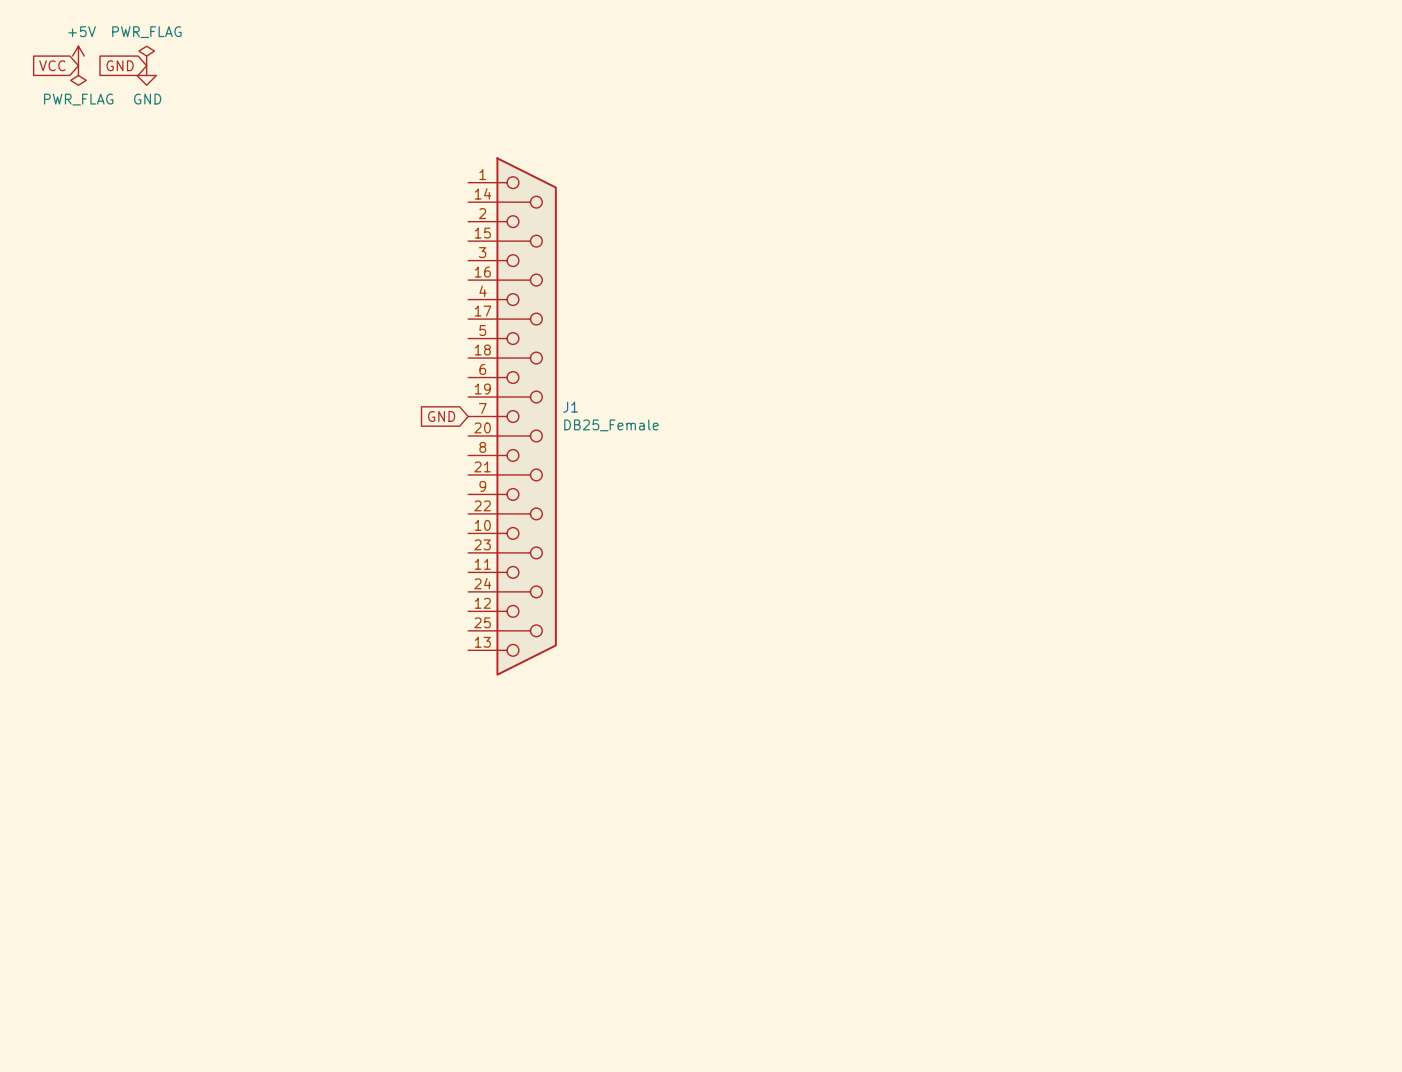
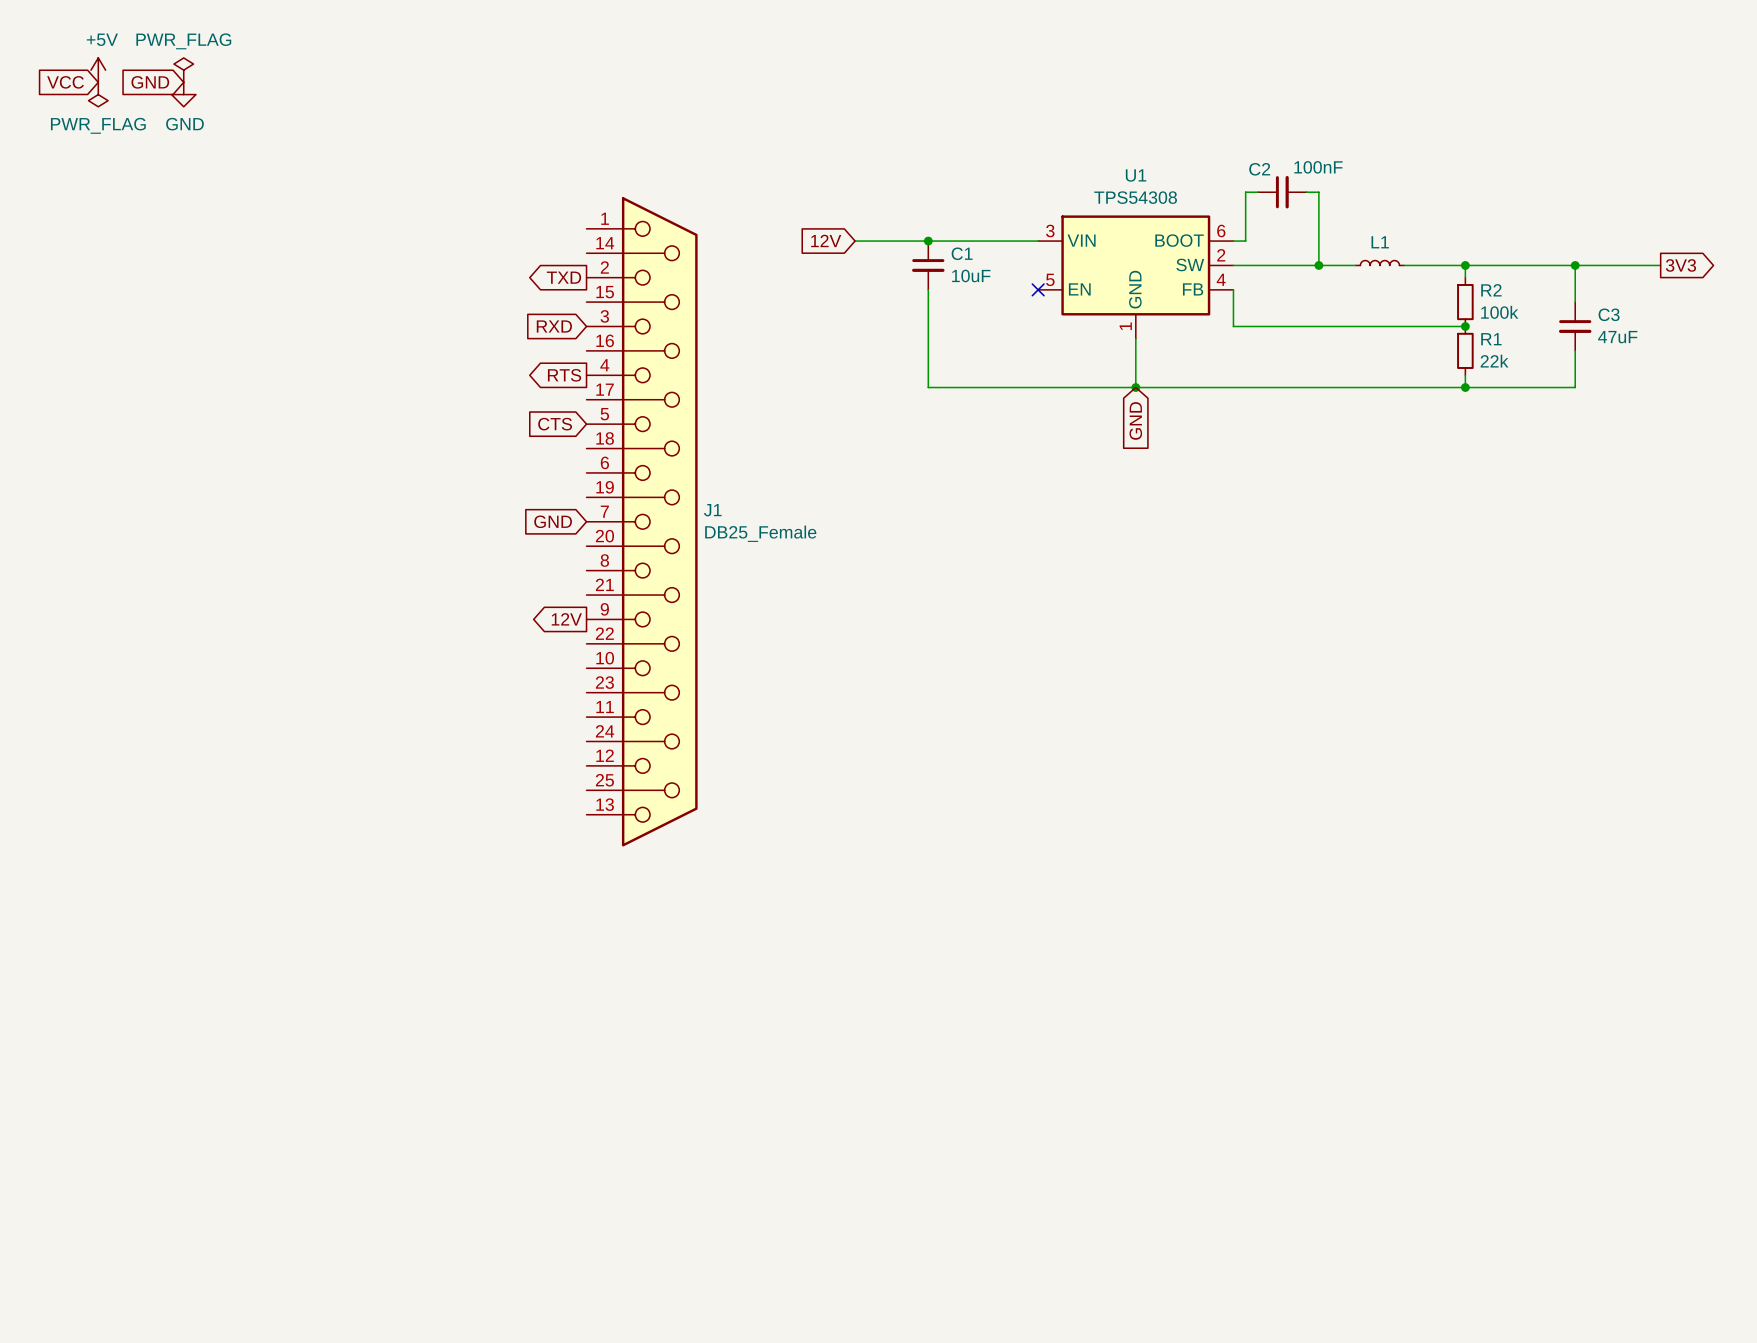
wire: none -> (1257, 192) (1245, 192) (1245, 241) (1233, 241)
C2: none -> 100nF (1282, 192)
wire: none -> (1306, 192) (1318, 192) (1318, 265)
global label: none -> 12V (826, 240)
wire: none -> (855, 241) (1038, 241)
junction: none -> (928, 241)
L1: none -> (1379, 263)
C1: none -> 10uF (928, 265)
wire: none -> (1233, 265) (1355, 265)
junction: none -> (1318, 265)
wire: none -> (1404, 265) (1660, 265)
wire: none -> (1465, 265) (1465, 277)
junction: none -> (1465, 265)
wire: none -> (1575, 265) (1575, 302)
junction: none -> (1575, 265)
global label: none -> 3V3 (1680, 265)
global label: none -> TXD (563, 277)
U1: none -> TPS54308 (1135, 277)
wire: none -> (928, 289) (928, 387) (1575, 387) (1575, 350)
no-connect mark: none -> (1038, 289)
wire: none -> (1233, 289) (1233, 326) (1465, 326)
R2: none -> 100k (1465, 302)
global label: none -> RXD (554, 326)
junction: none -> (1465, 326)
C3: none -> 47uF (1575, 326)
wire: none -> (1135, 338) (1135, 387)
R1: none -> 22k (1465, 350)
global label: none -> RTS (564, 375)
wire: none -> (1465, 375) (1465, 387)
junction: none -> (1135, 387)
junction: none -> (1465, 387)
global label: none -> GND (1135, 420)
global label: none -> CTS (555, 424)
global label: none -> 12V (566, 619)

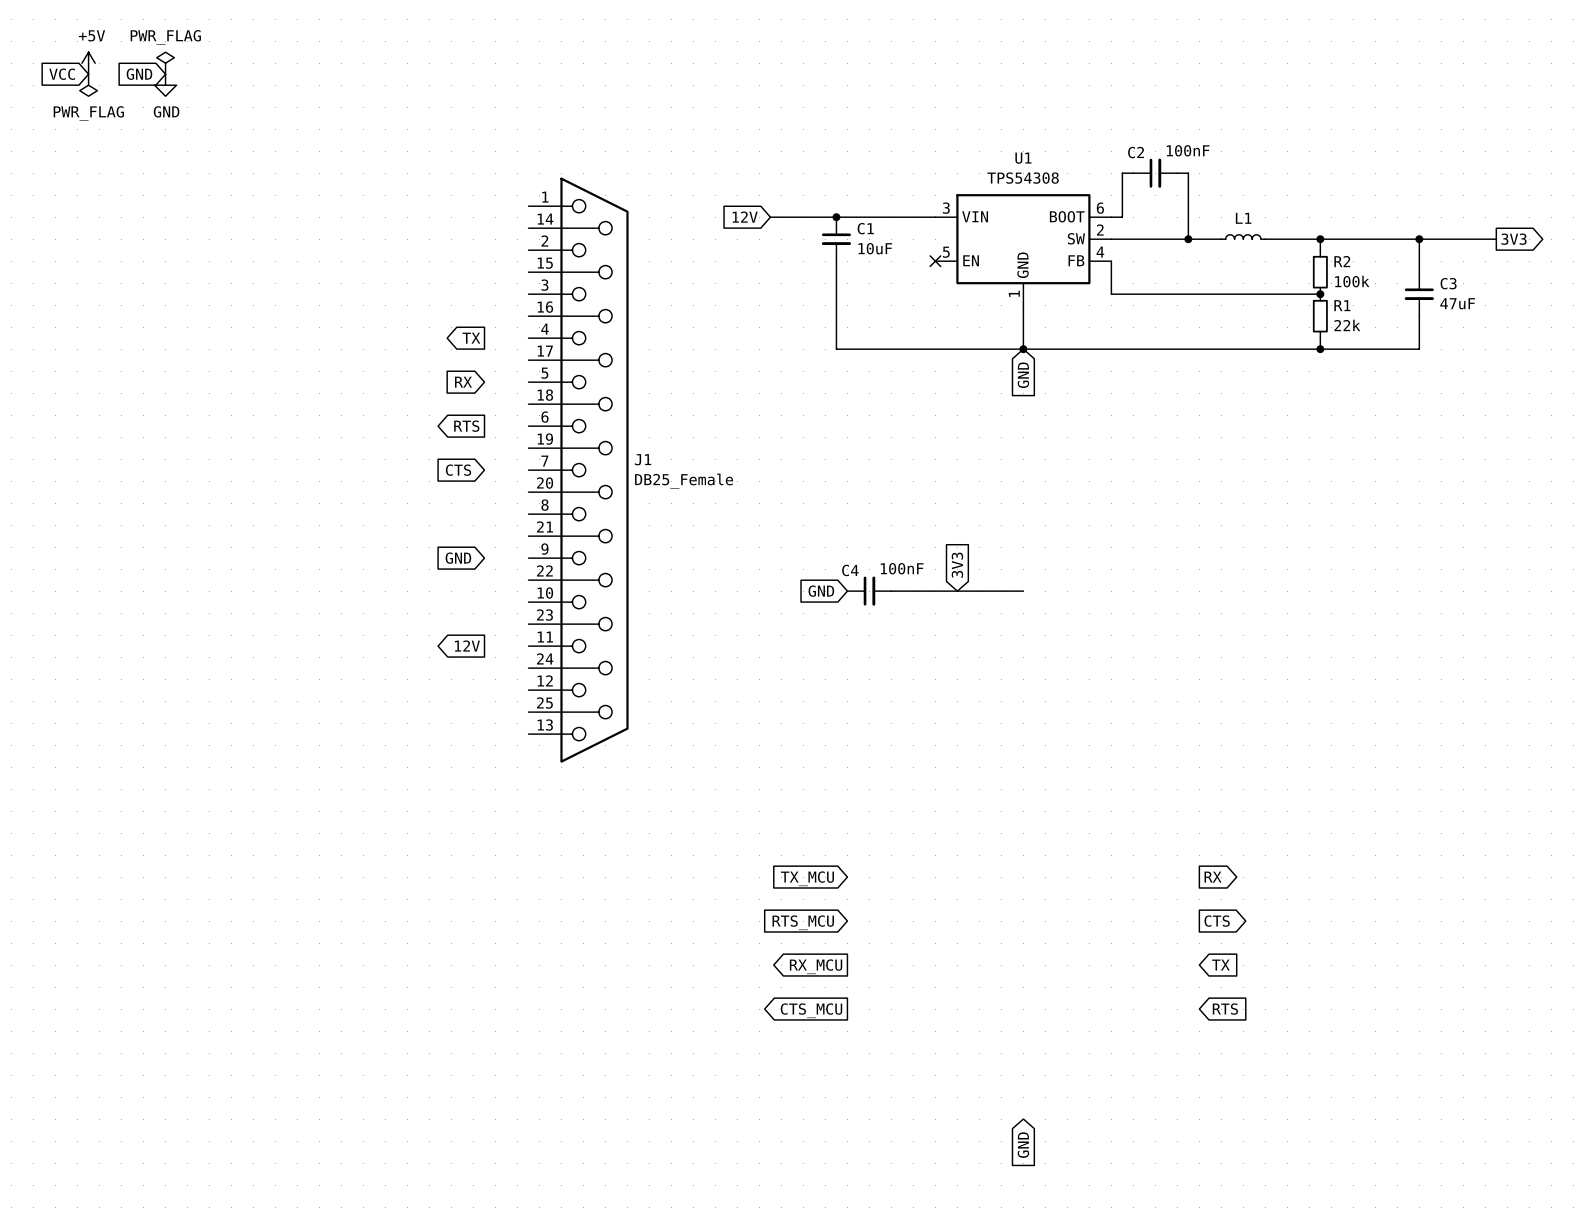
global label: TXD (563, 277) -> none
global label: RXD (554, 326) -> none
global label: none -> TX (471, 338)
global label position: RTS (564, 375) -> RTS (466, 426)
global label: none -> RX (463, 382)
global label position: CTS (555, 424) -> CTS (458, 470)
global label position: GND (553, 521) -> GND (458, 558)
global label position: 12V (566, 619) -> 12V (467, 646)
global label: none -> 3V3 (957, 565)
global label: none -> GND (821, 591)
C4: none -> 100nF (869, 591)
wire: none -> (891, 591) (1023, 591)
global label: none -> RX (1213, 877)
global label: none -> TX_MCU (807, 878)
global label: none -> CTS (1217, 921)
global label: none -> RTS_MCU (803, 922)
global label: none -> TX (1220, 965)
global label: none -> RX_MCU (816, 966)
global label: none -> RTS (1225, 1009)
global label: none -> CTS_MCU (811, 1010)
global label: none -> GND (1023, 1145)

